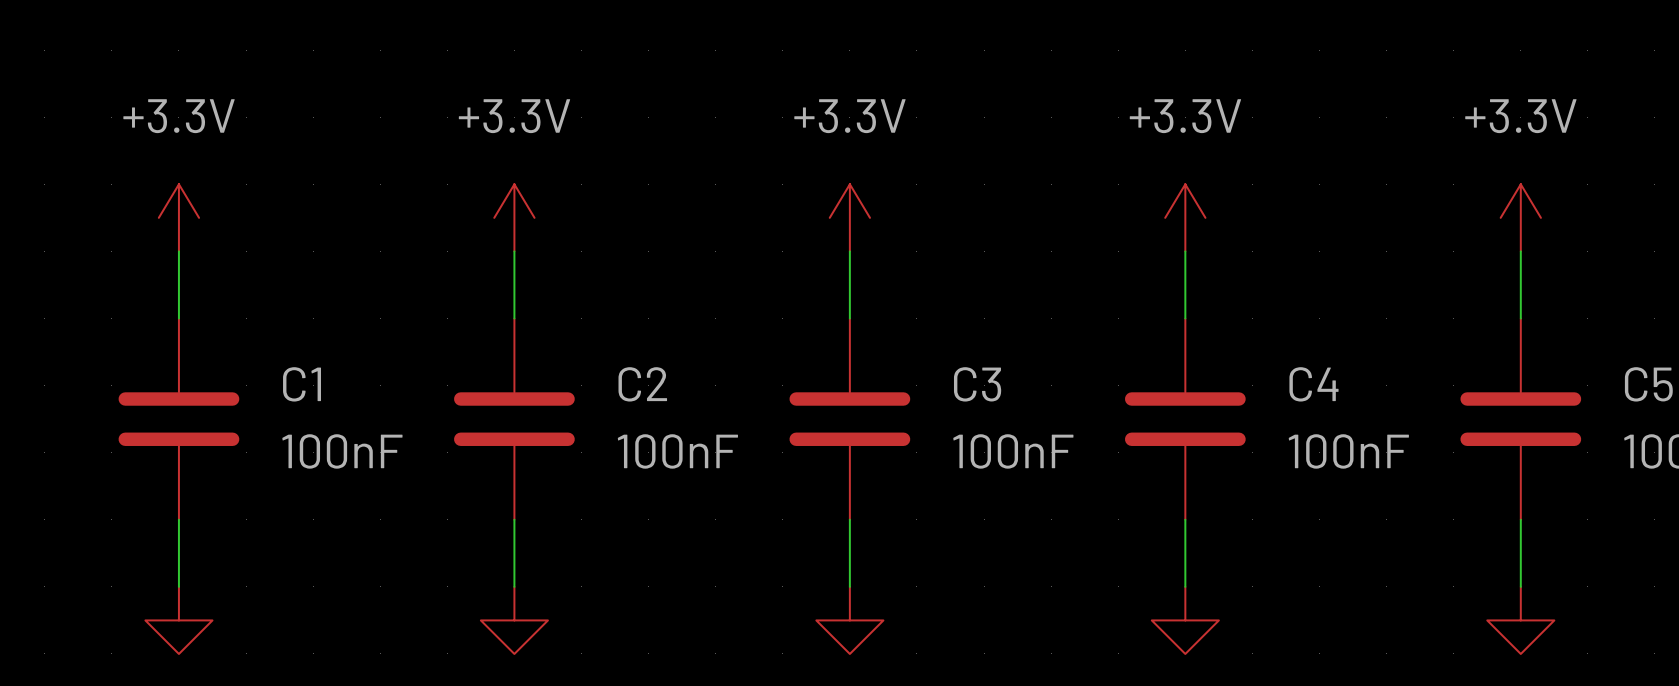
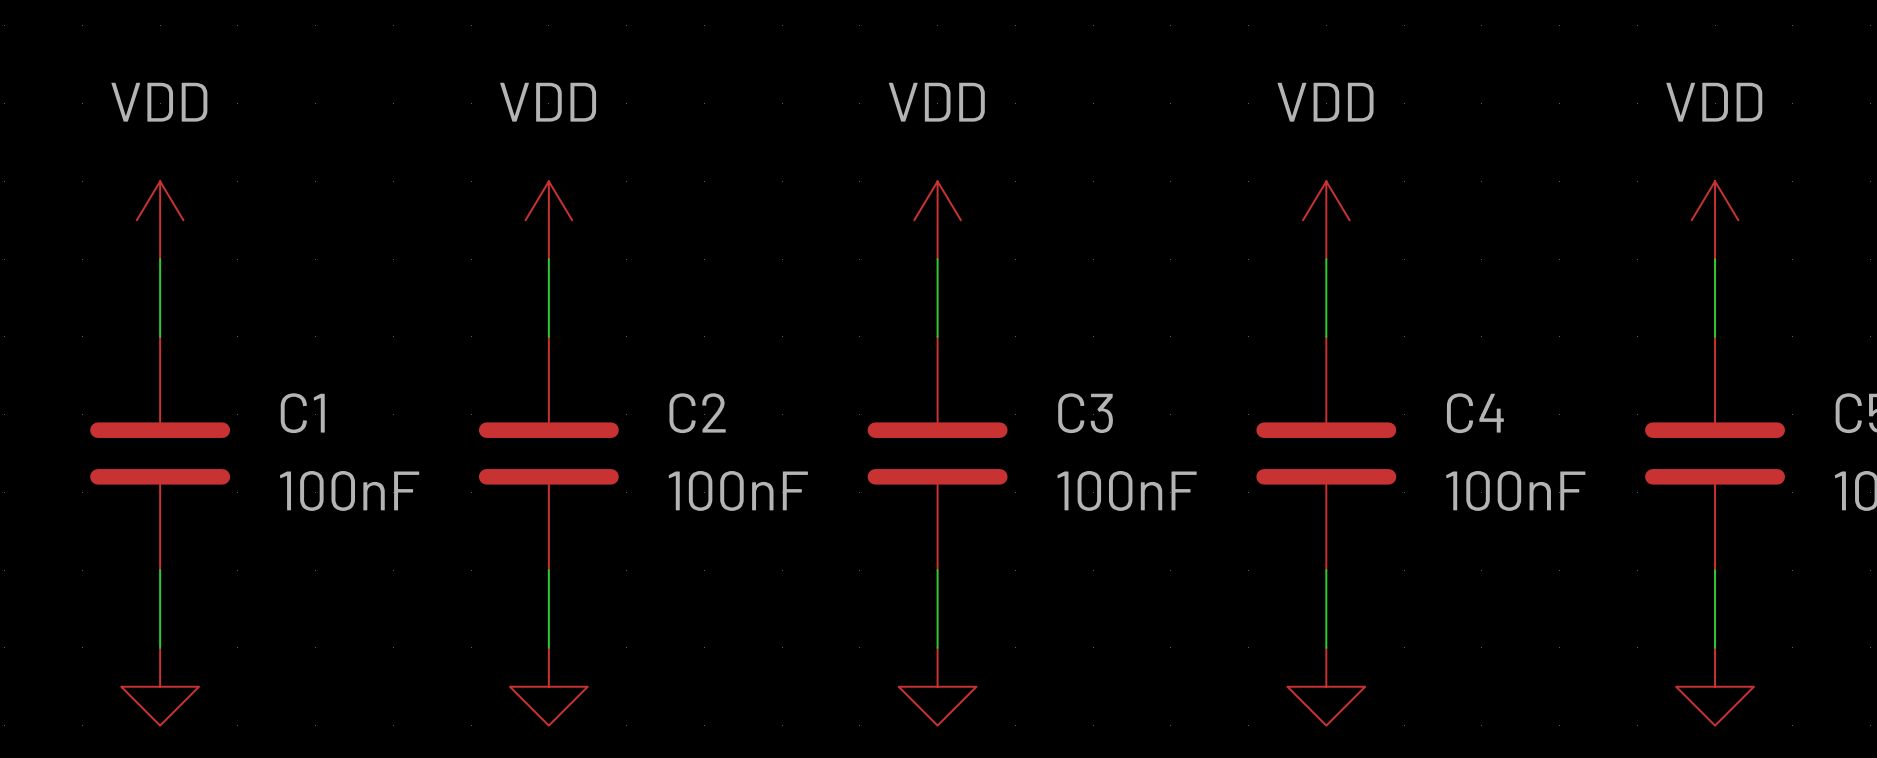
power symbol: +3.3V (178, 217) -> VDD (160, 220)
power symbol: +3.3V (514, 217) -> VDD (548, 220)
power symbol: +3.3V (849, 217) -> VDD (937, 220)
power symbol: +3.3V (1185, 217) -> VDD (1326, 220)
power symbol: +3.3V (1520, 217) -> VDD (1715, 220)

